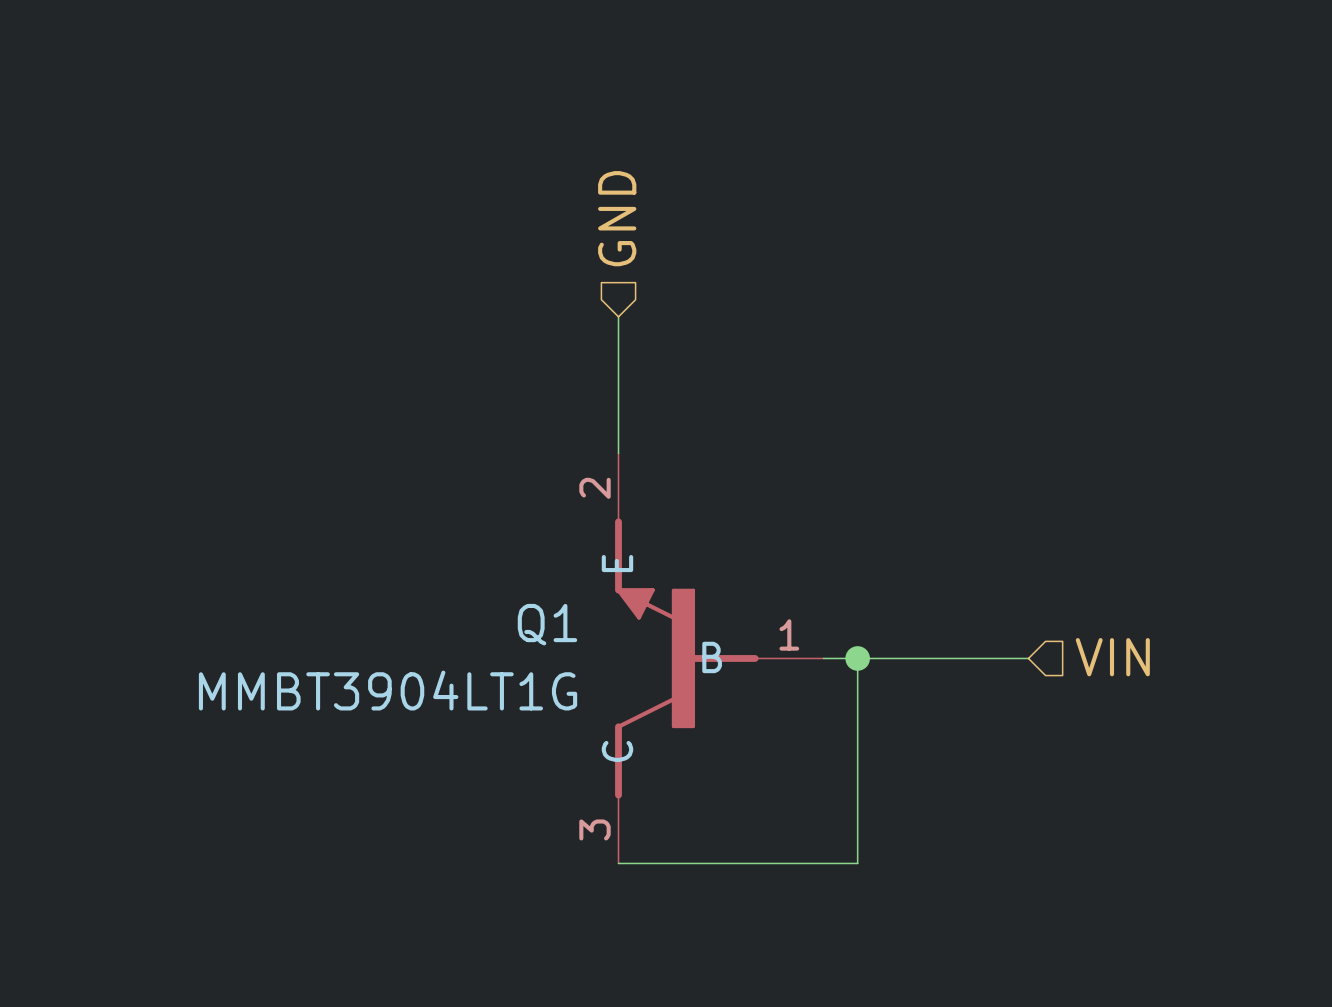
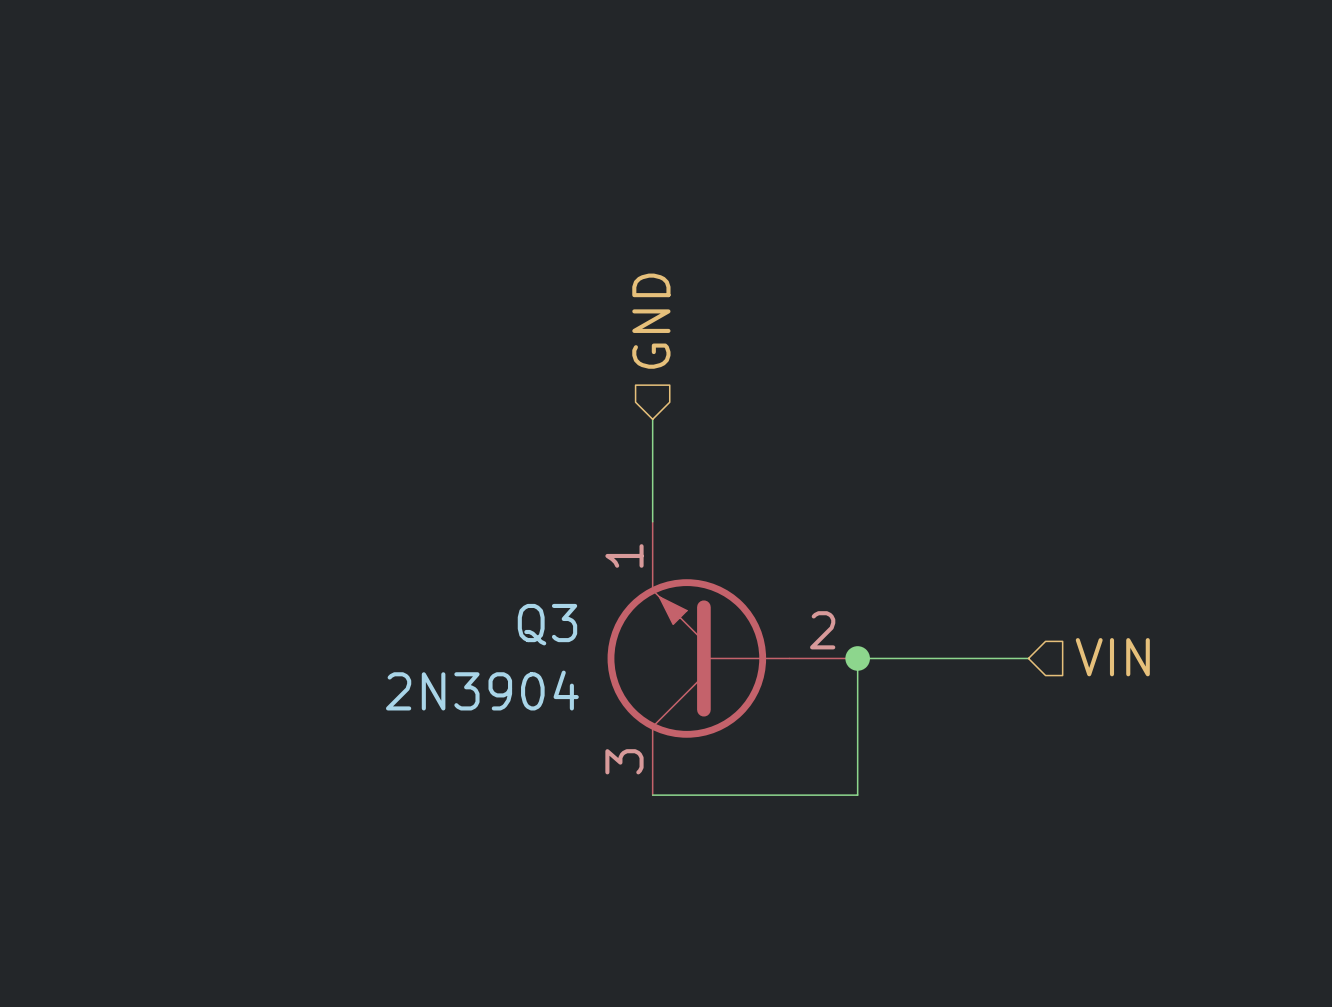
hierarchical label position: GND (617, 218) -> GND (651, 321)
wire: (618, 316) (618, 453) -> none
wire: none -> (652, 419) (652, 521)
Q1: MMBT3904LT1G (719, 658) -> none
Q3: none -> 2N3904 (732, 658)
wire: (857, 795) (857, 863) (618, 863) -> (857, 795) (652, 795)

